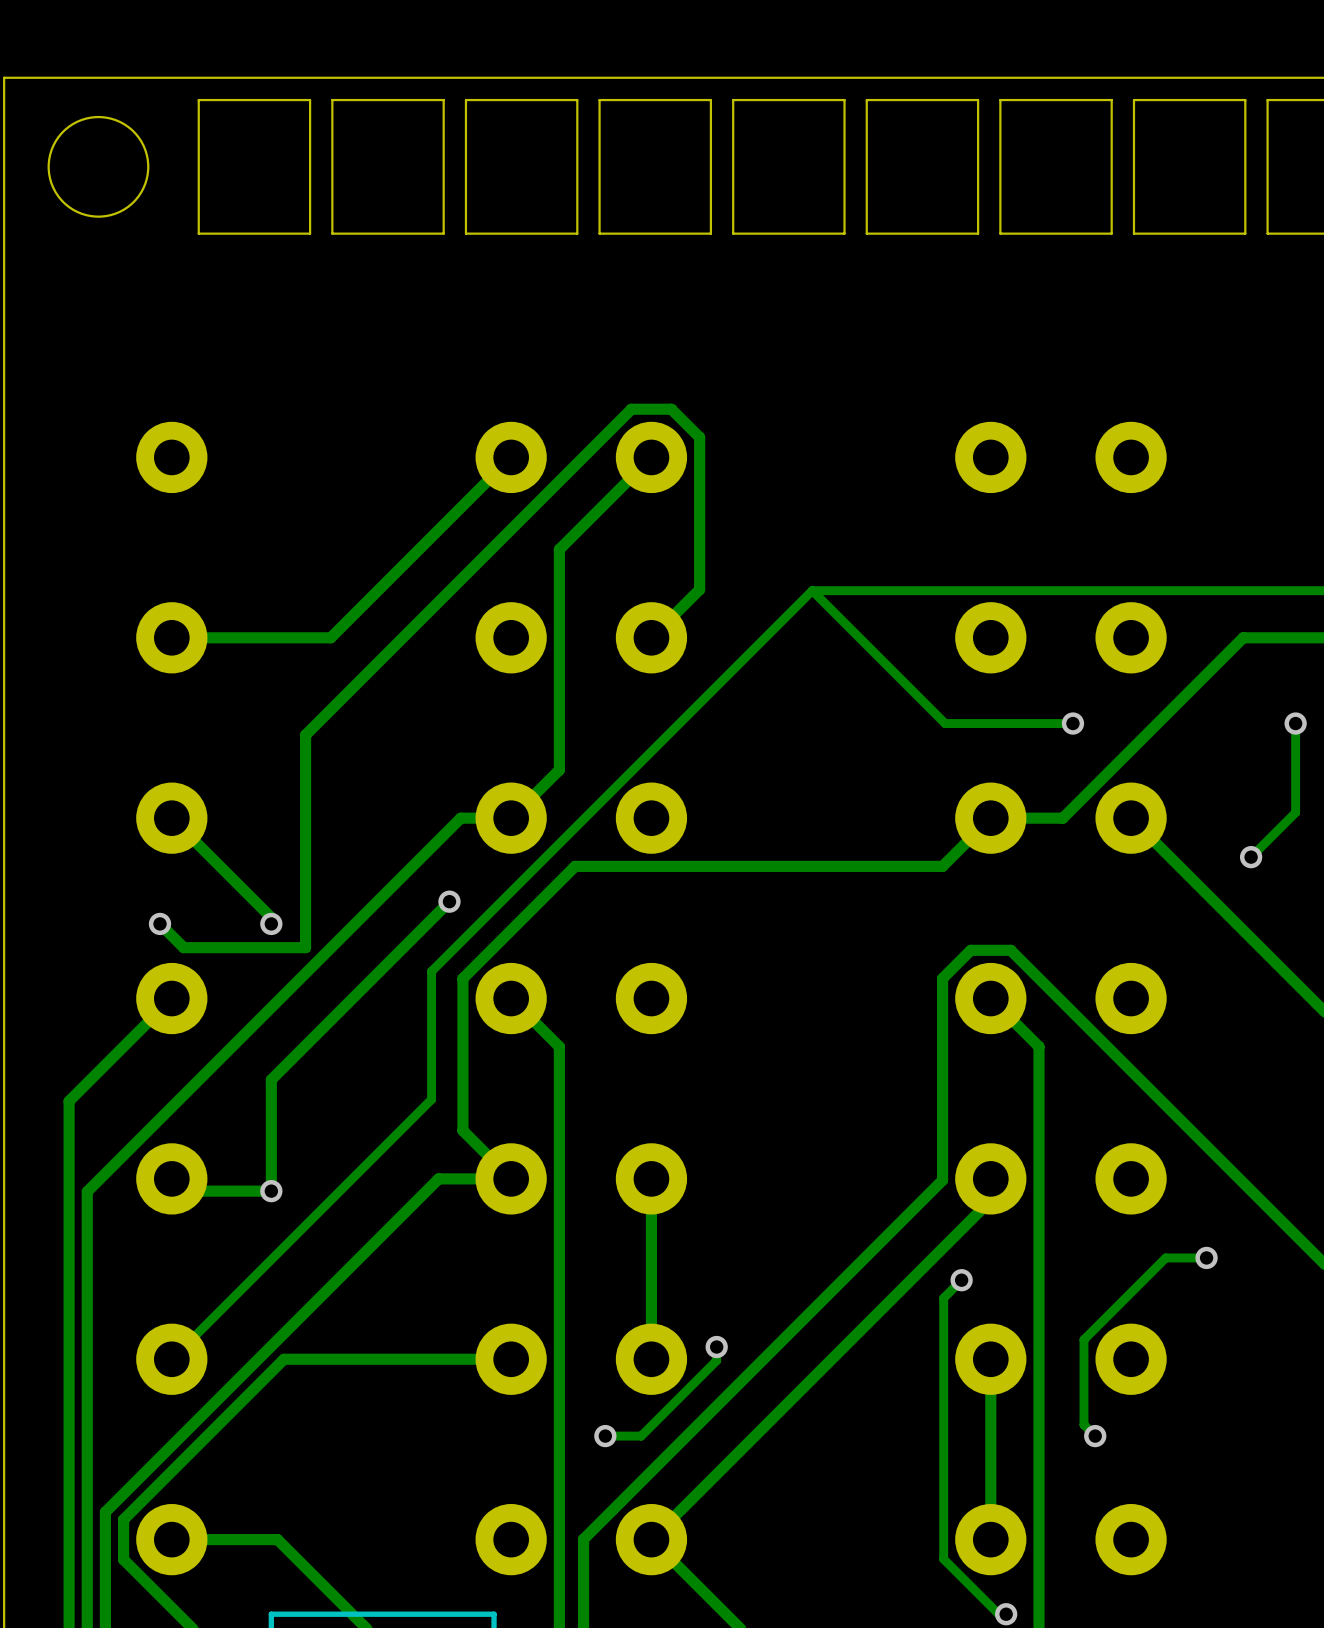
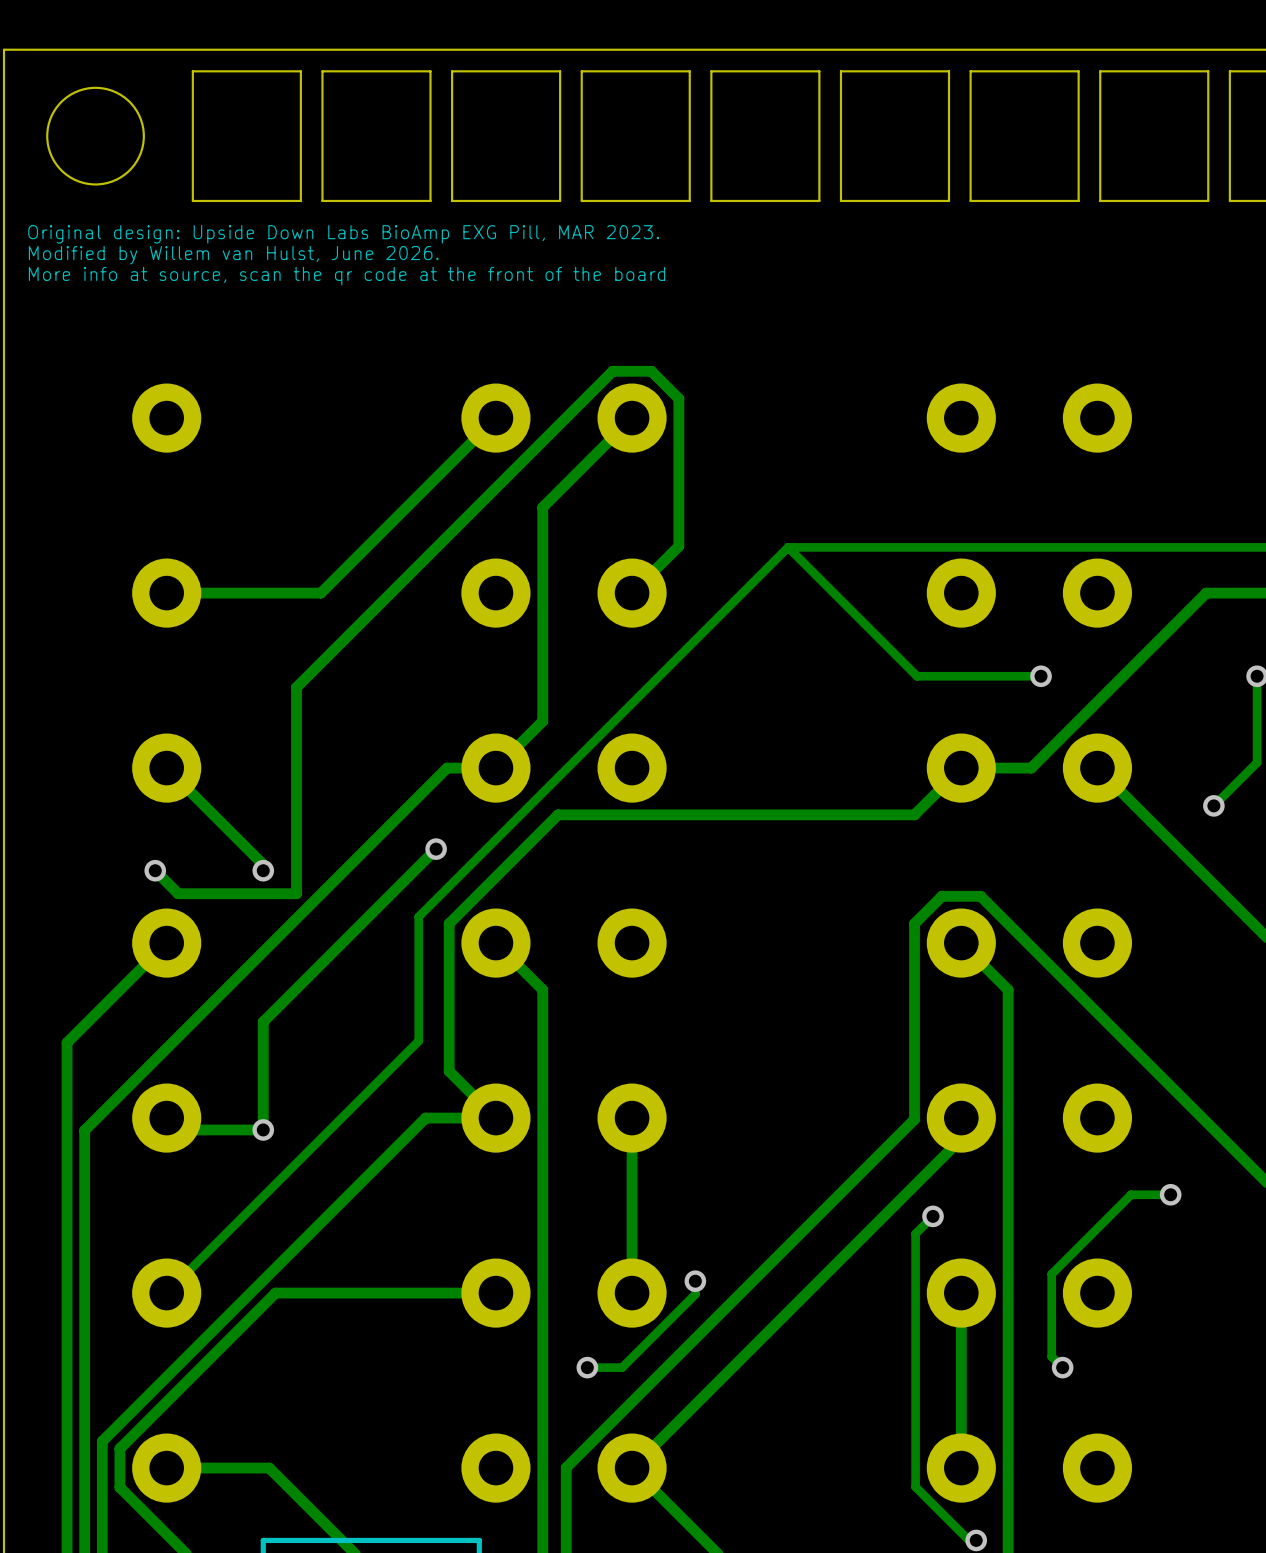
text: none -> Original design: Upside Down Labs BioAmp EXG Pill, MAR 2023. (343, 234)
text: none -> Modified by Willem van Hulst, June 2026. (233, 255)
text: none -> More info at source, scan the qr code at the front of the board (347, 276)

